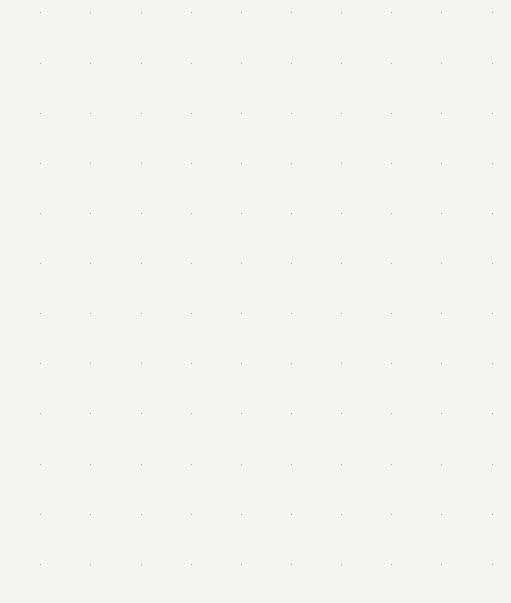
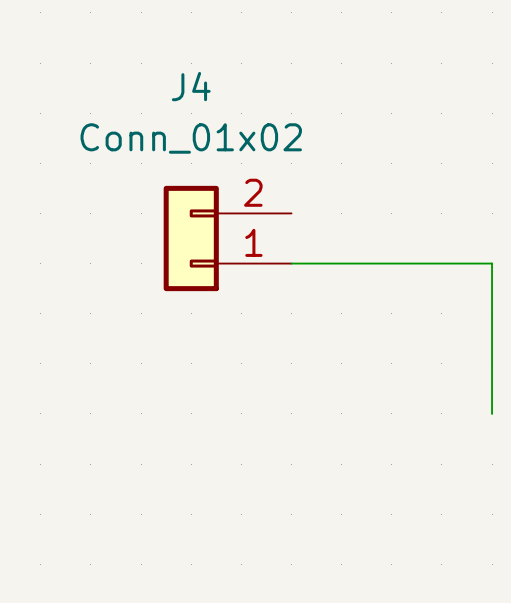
J4: none -> Conn_01x02 (227, 238)
wire: none -> (291, 263) (492, 263) (492, 413)

